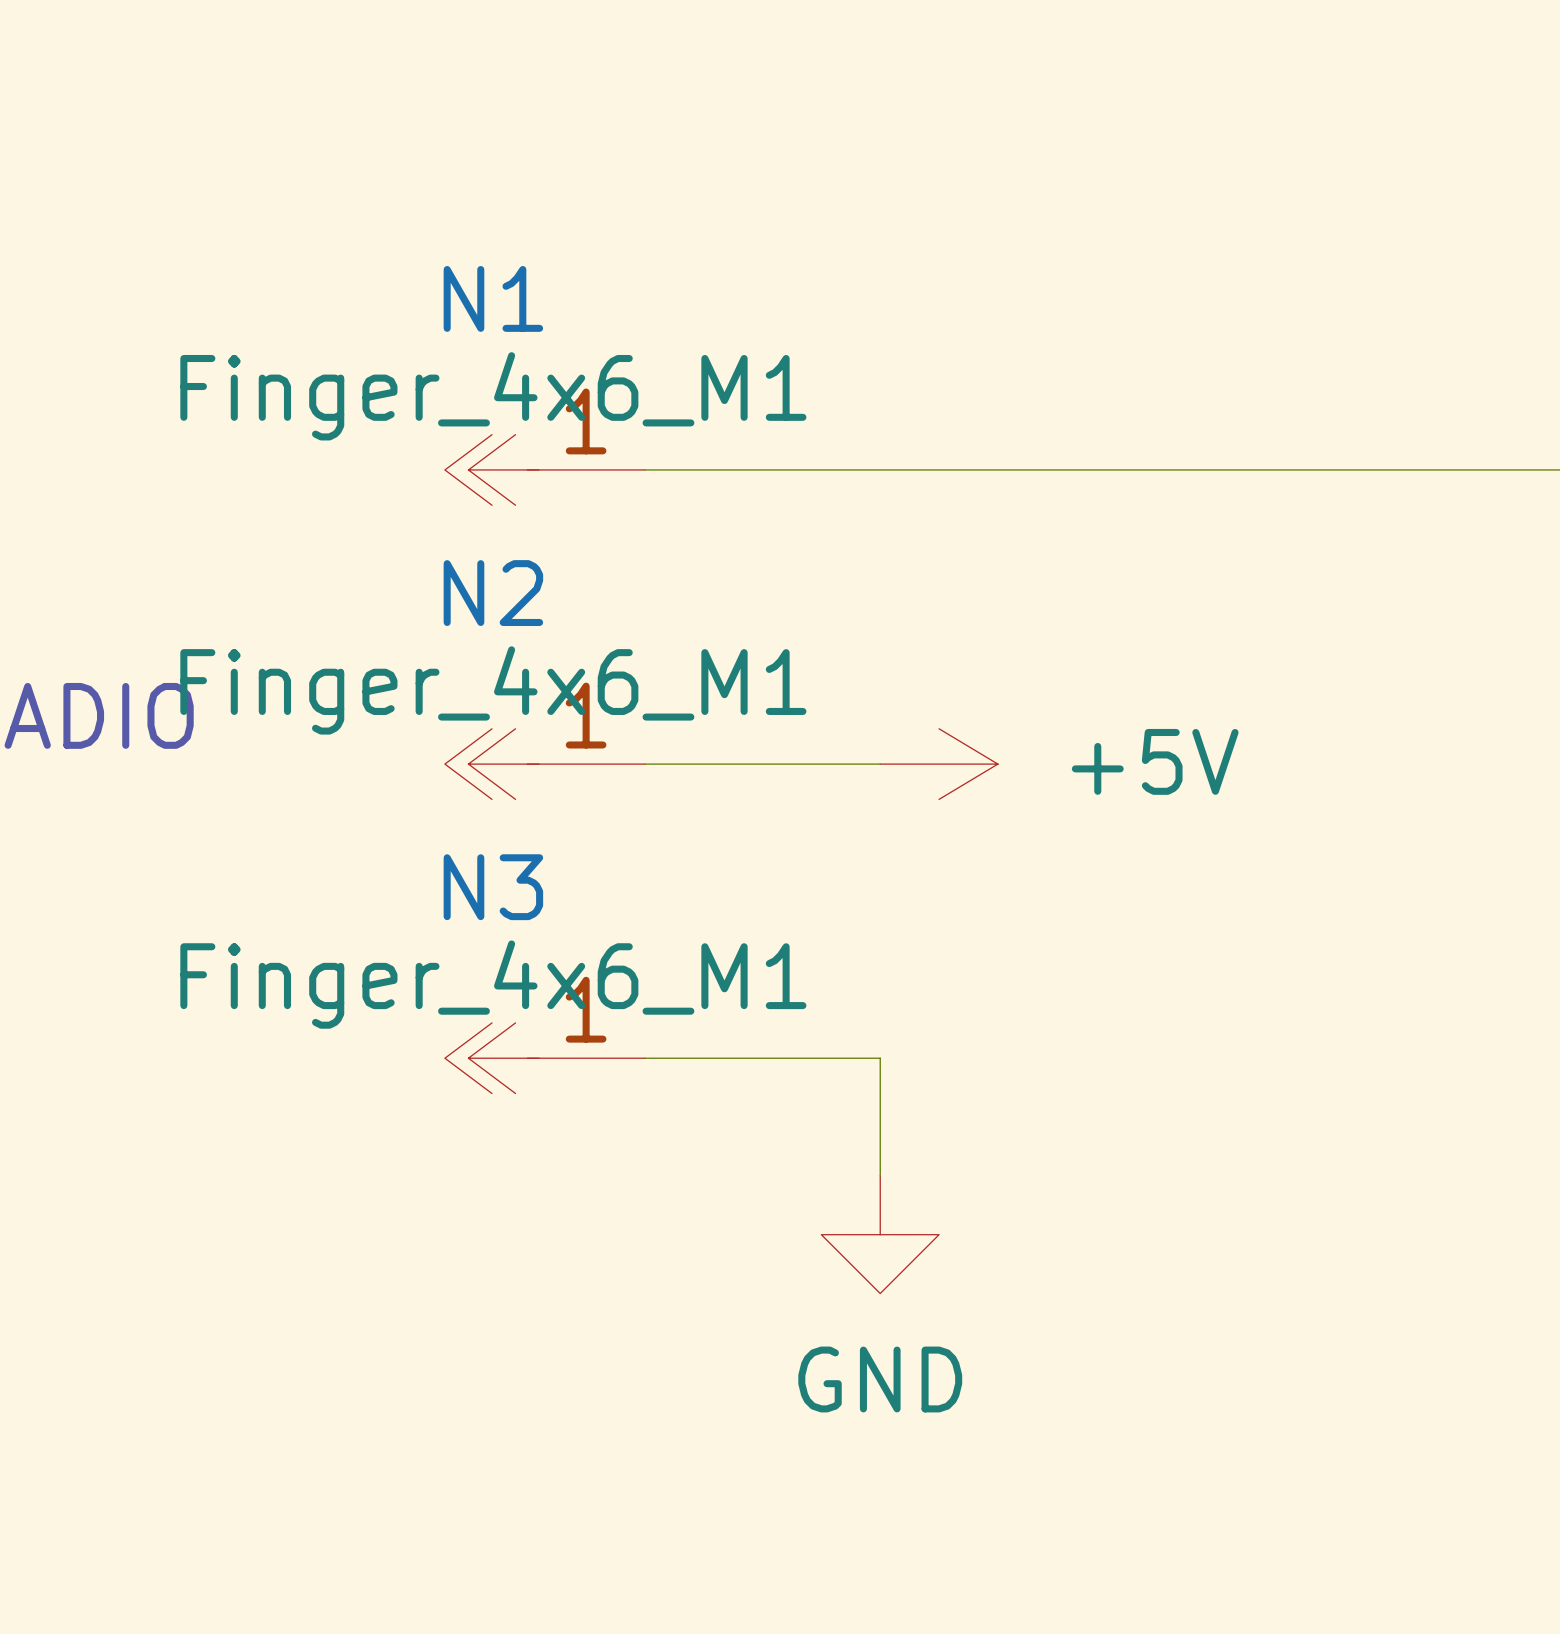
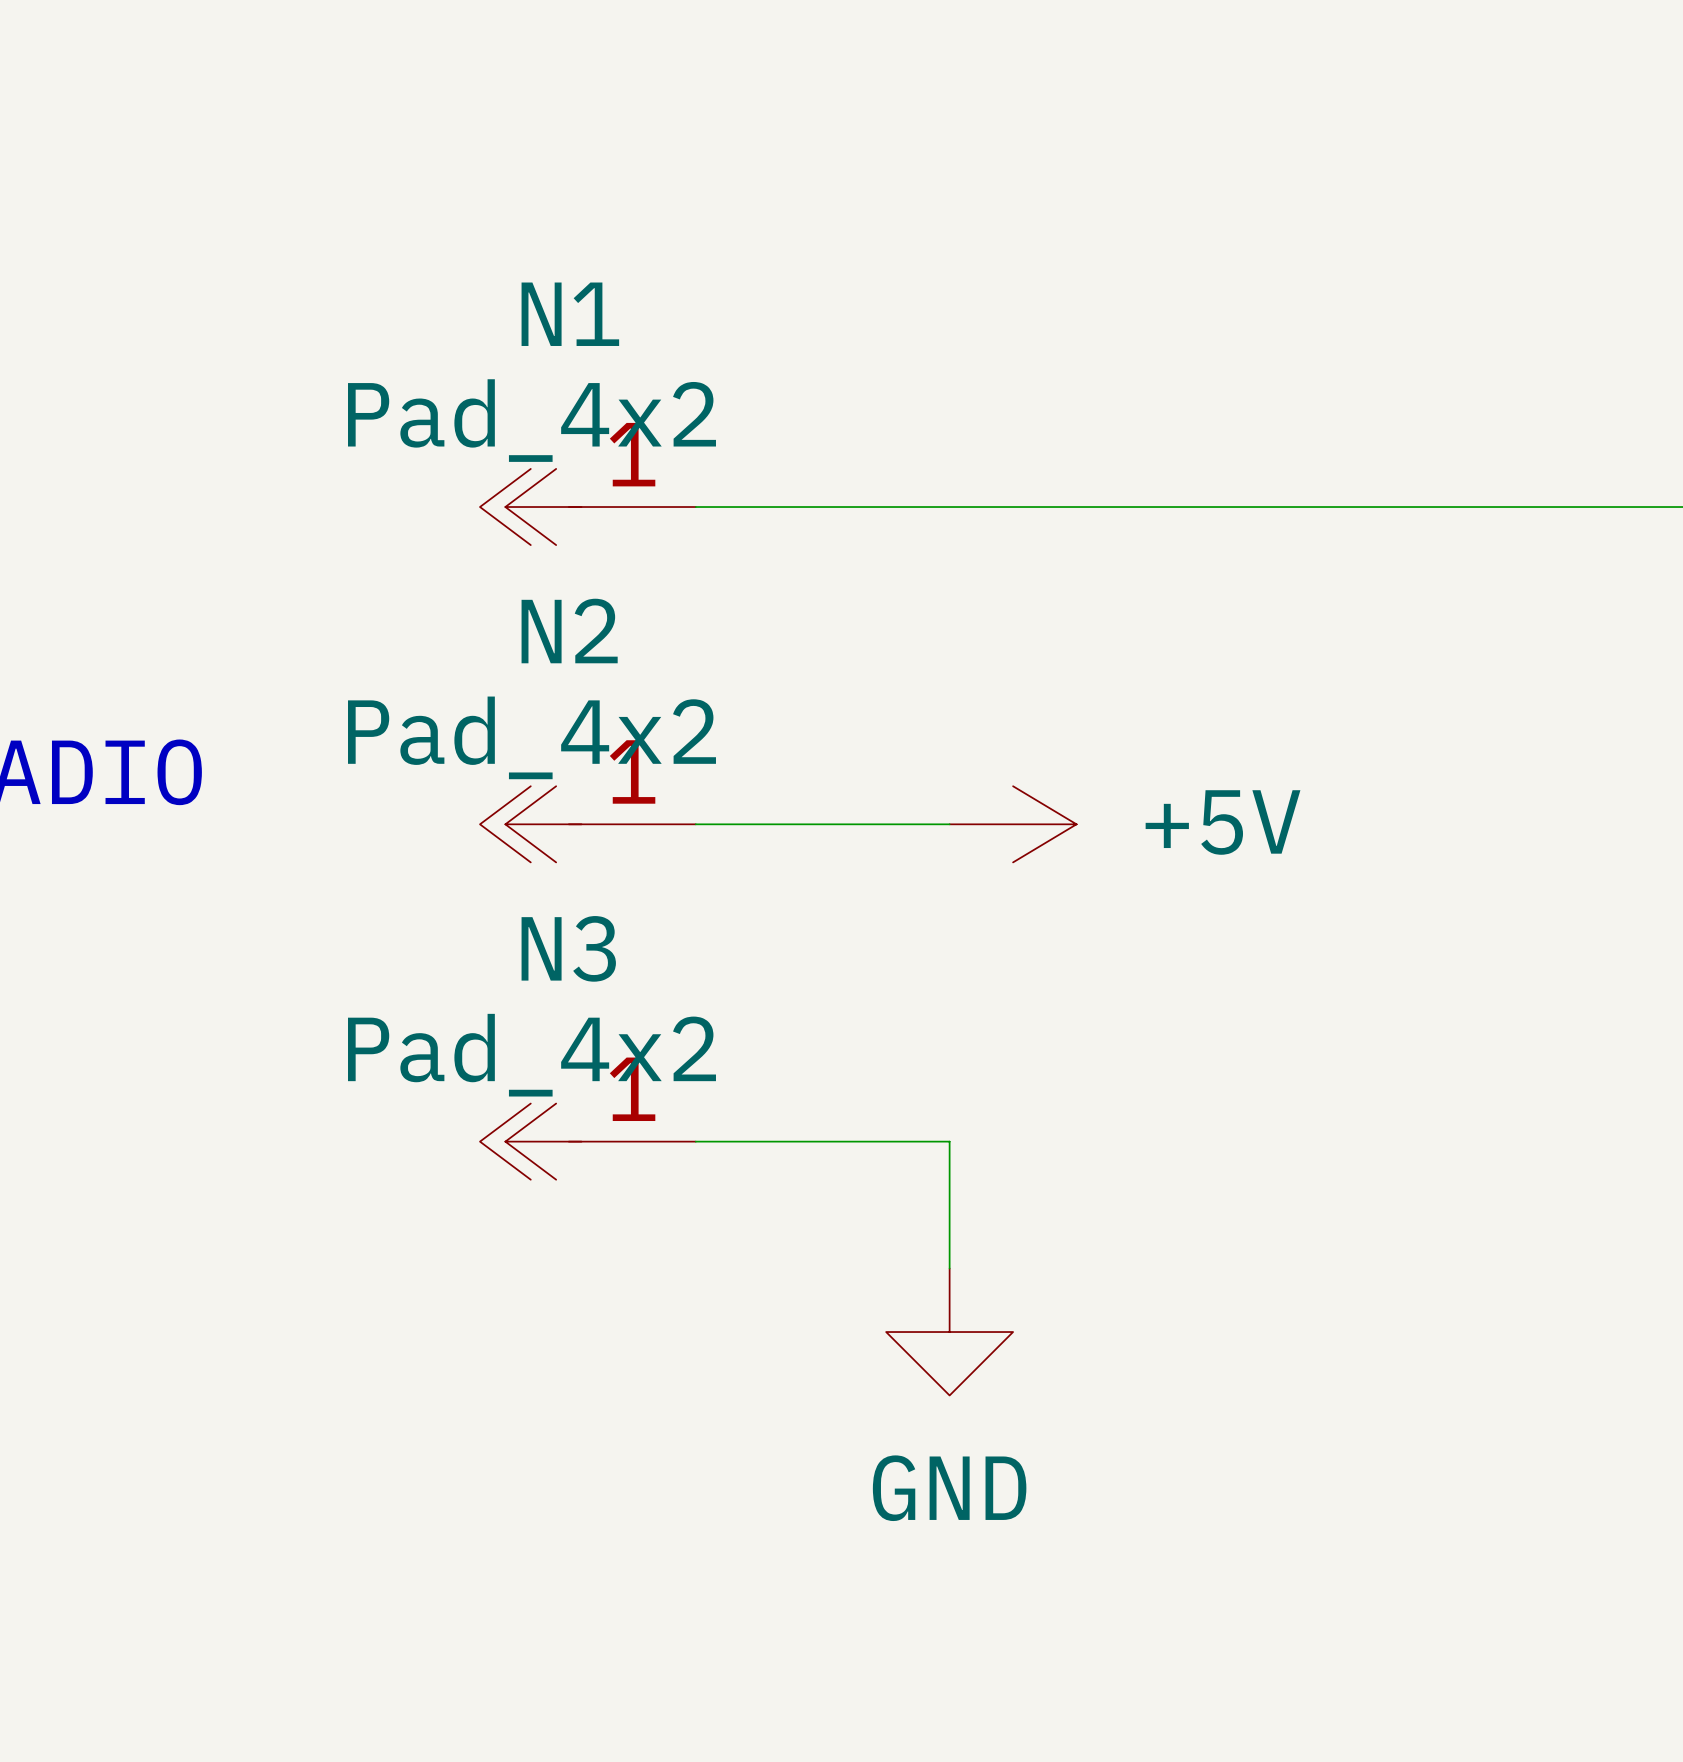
N1 name position: N1 (493, 298) -> N1 (570, 314)
N1 value: Finger_4x6_M1 (493, 396) -> Pad_4x2 (531, 420)
N2 name position: N2 (493, 593) -> N2 (569, 631)
N2 value: Finger_4x6_M1 (493, 690) -> Pad_4x2 (531, 737)
N3 name position: N3 (493, 887) -> N3 (568, 948)
N3 value: Finger_4x6_M1 (493, 984) -> Pad_4x2 (531, 1055)

